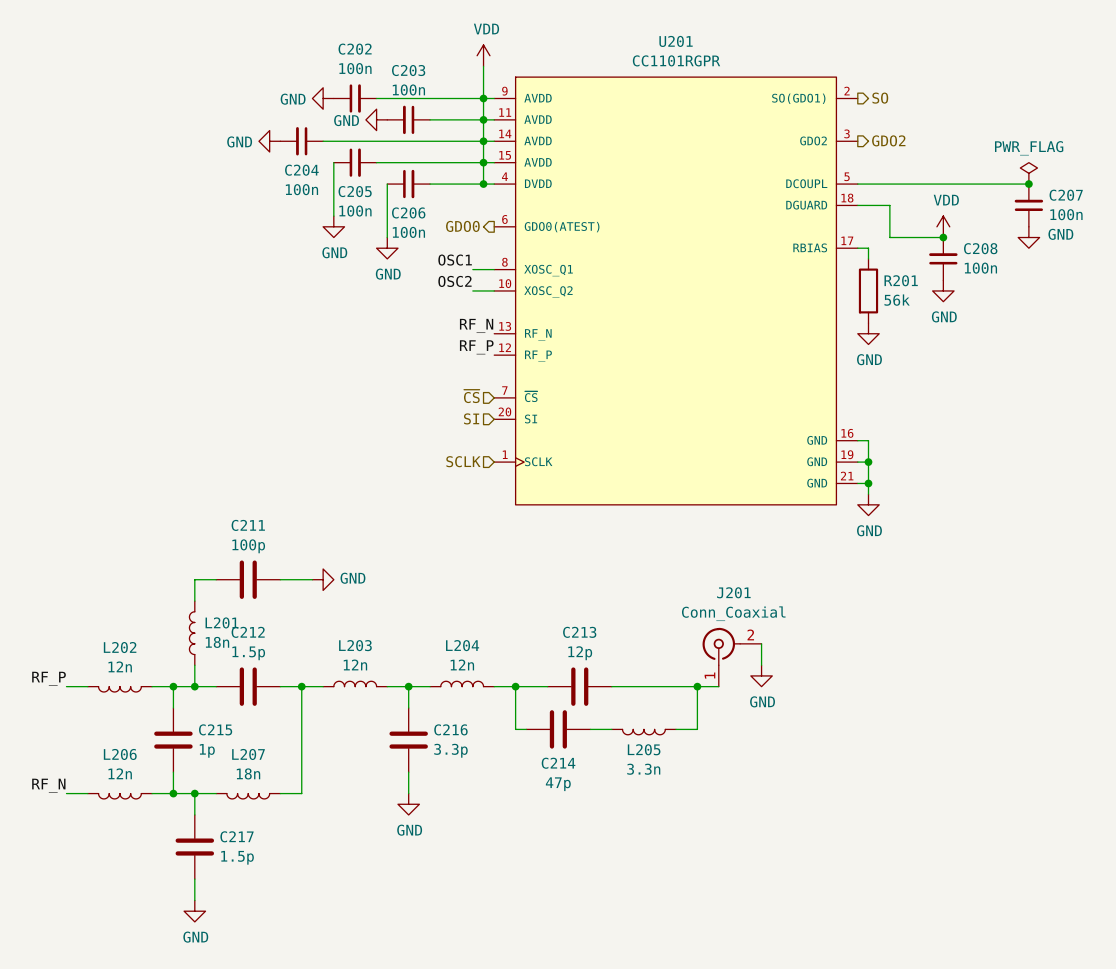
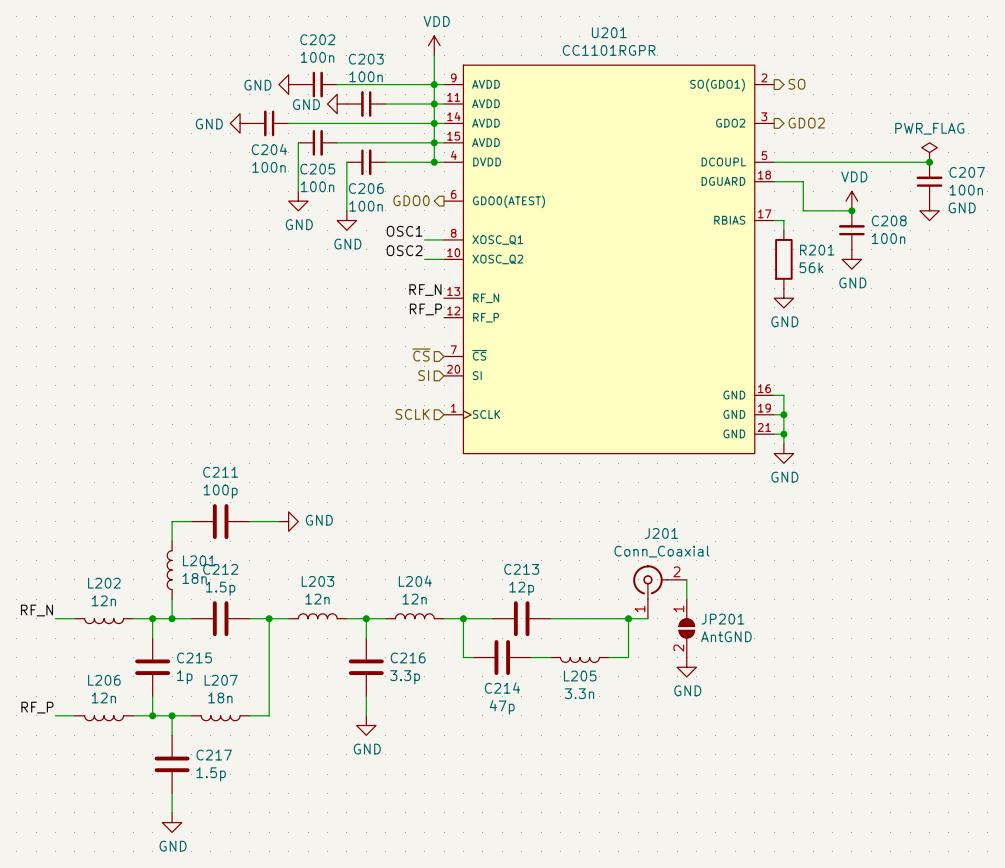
power symbol position: GND (761, 675) -> GND (686, 667)
label: RF_P (49, 678) -> RF_N (36, 610)
JP201: none -> AntGND (686, 628)
label: RF_N (48, 785) -> RF_P (37, 707)

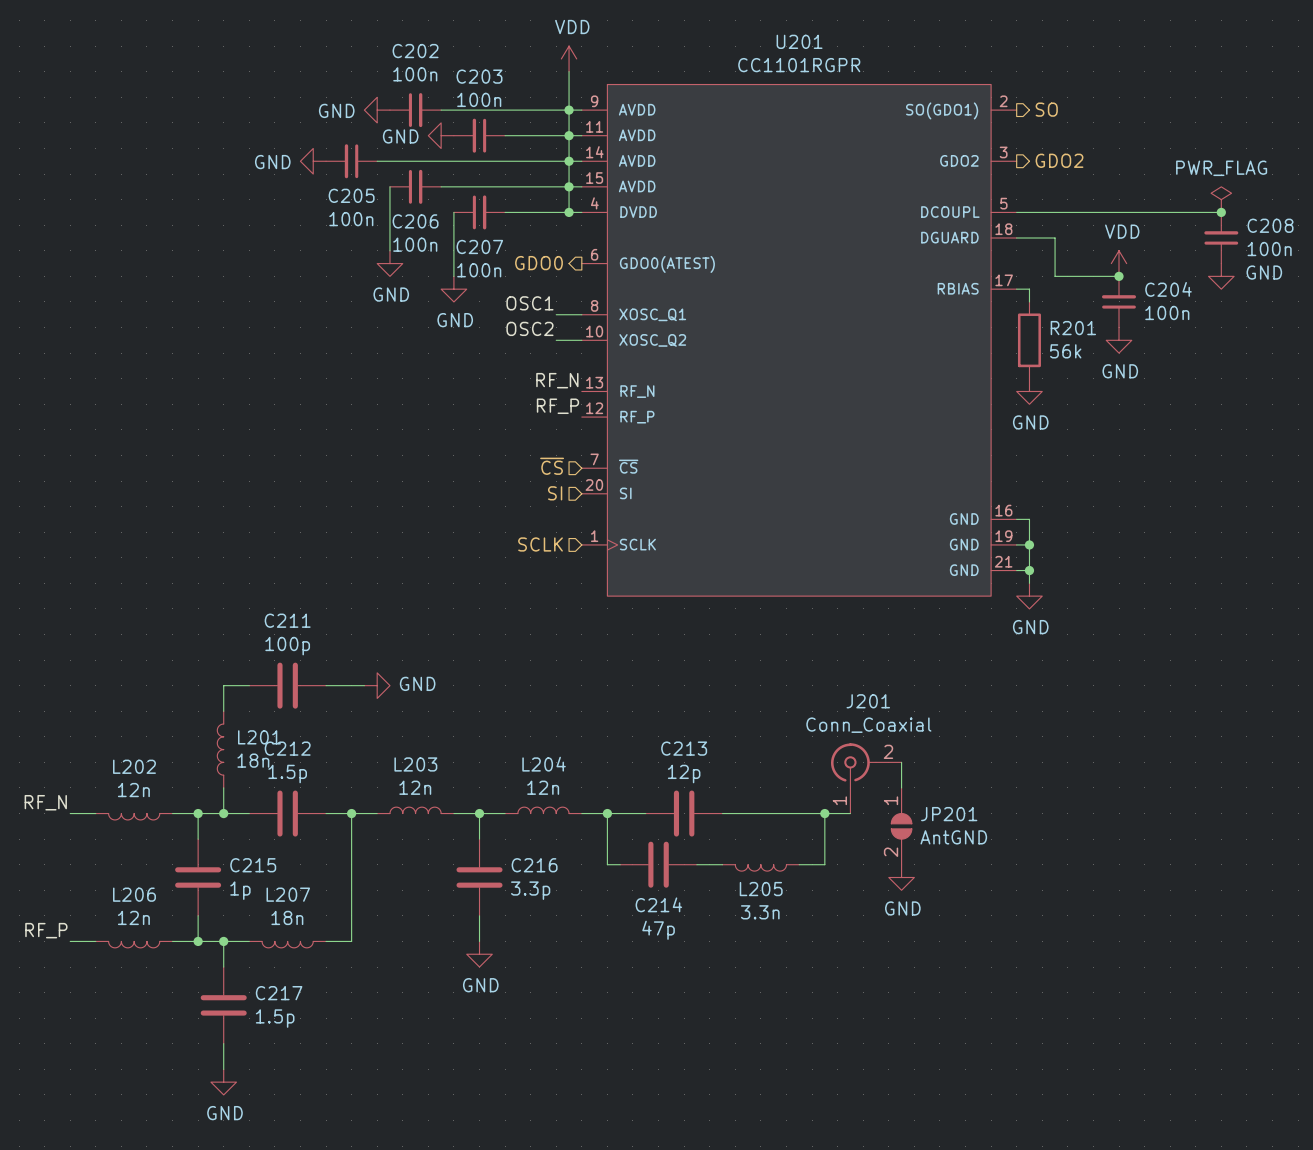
C204 name: C204 (269, 149) -> C205 (351, 195)
C205 name: C205 (317, 169) -> C206 (415, 221)
C207 name: C207 (967, 172) -> C208 (1270, 225)
C206 name: C206 (366, 188) -> C207 (479, 246)
C208 name: C208 (889, 220) -> C204 (1168, 289)

